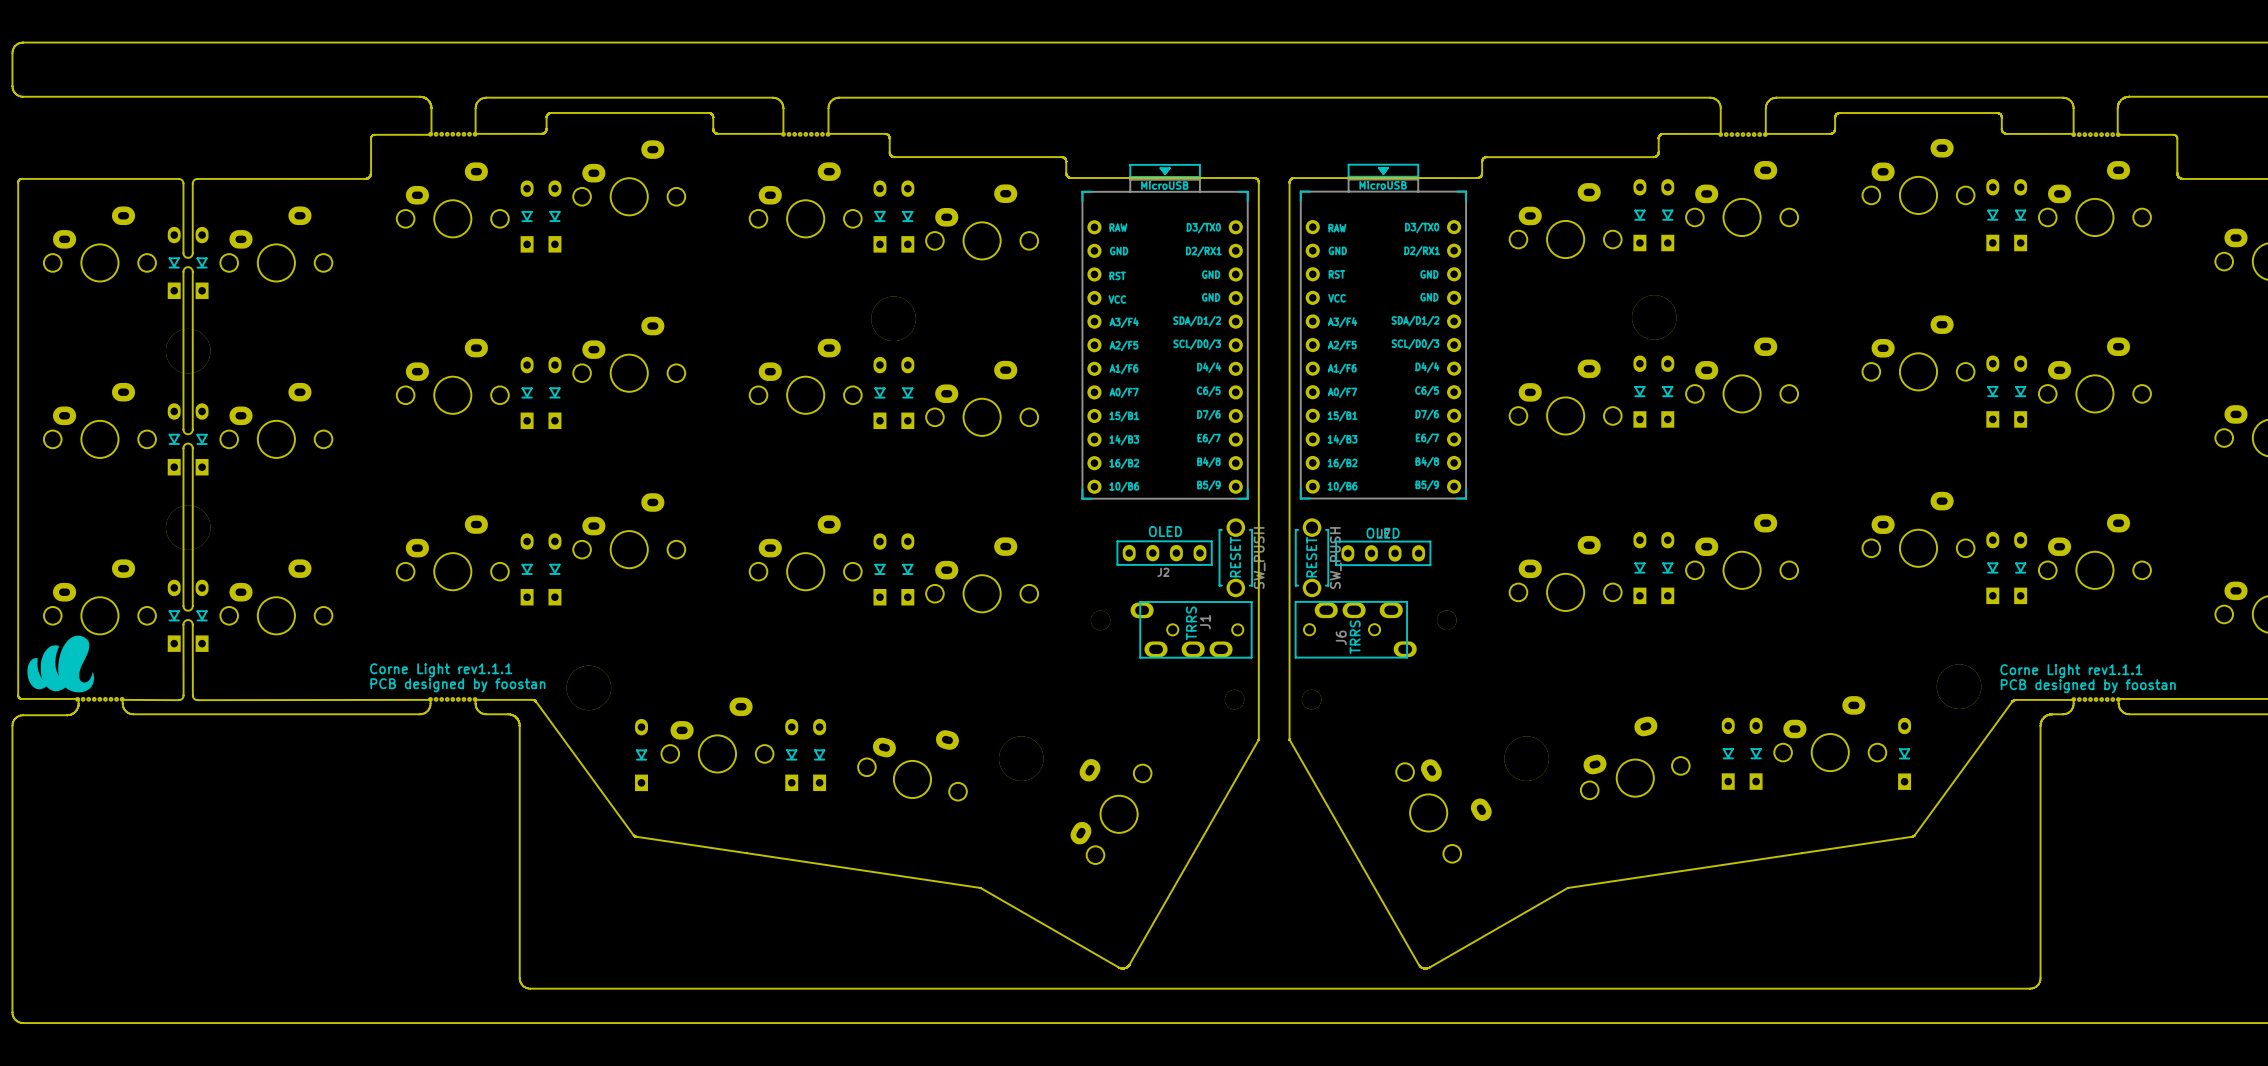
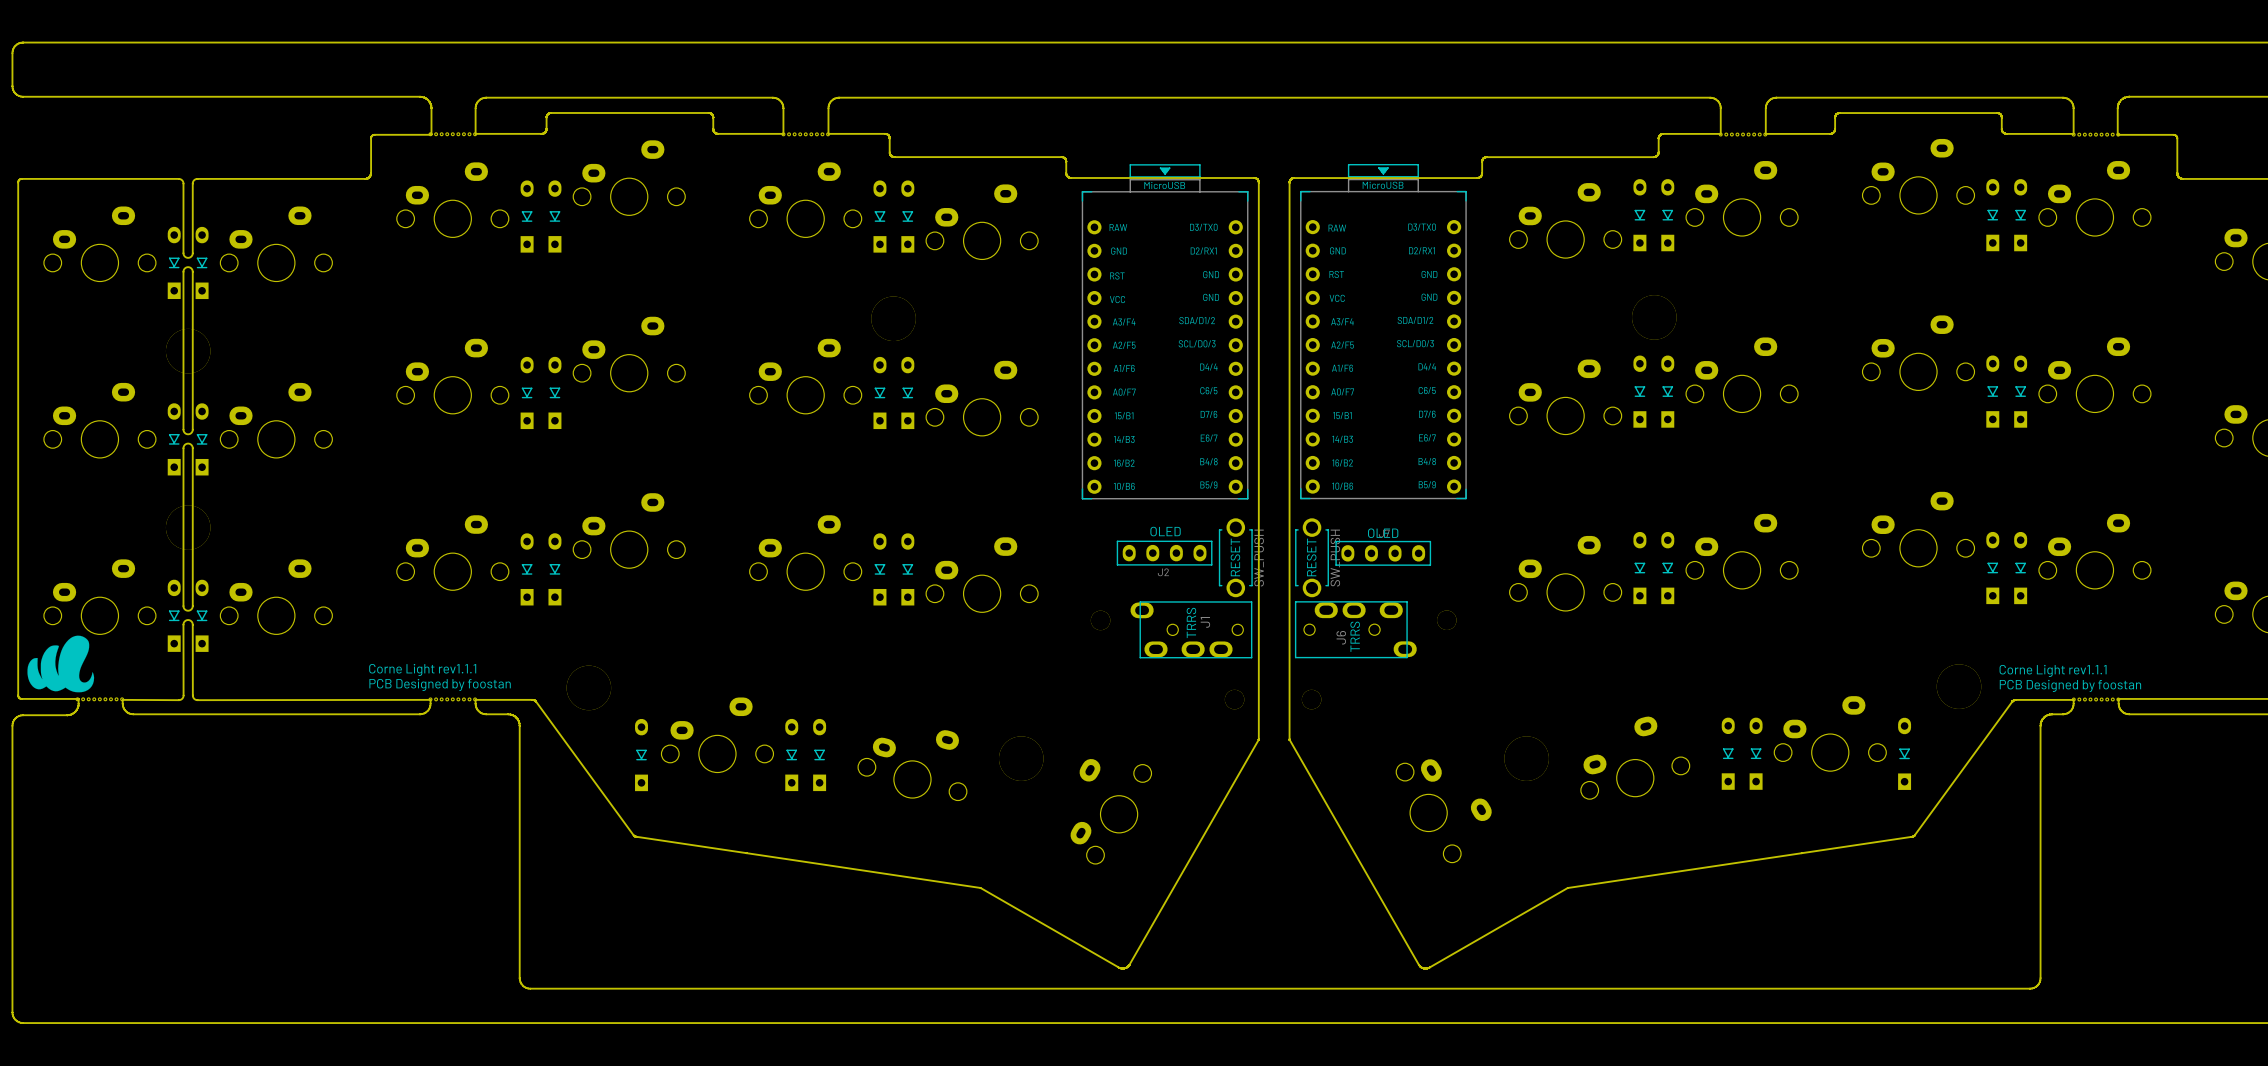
text: PCB designed by foostan (457, 685) -> PCB Designed by foostan (440, 684)
text: PCB designed by foostan (2088, 686) -> PCB Designed by foostan (2070, 685)

